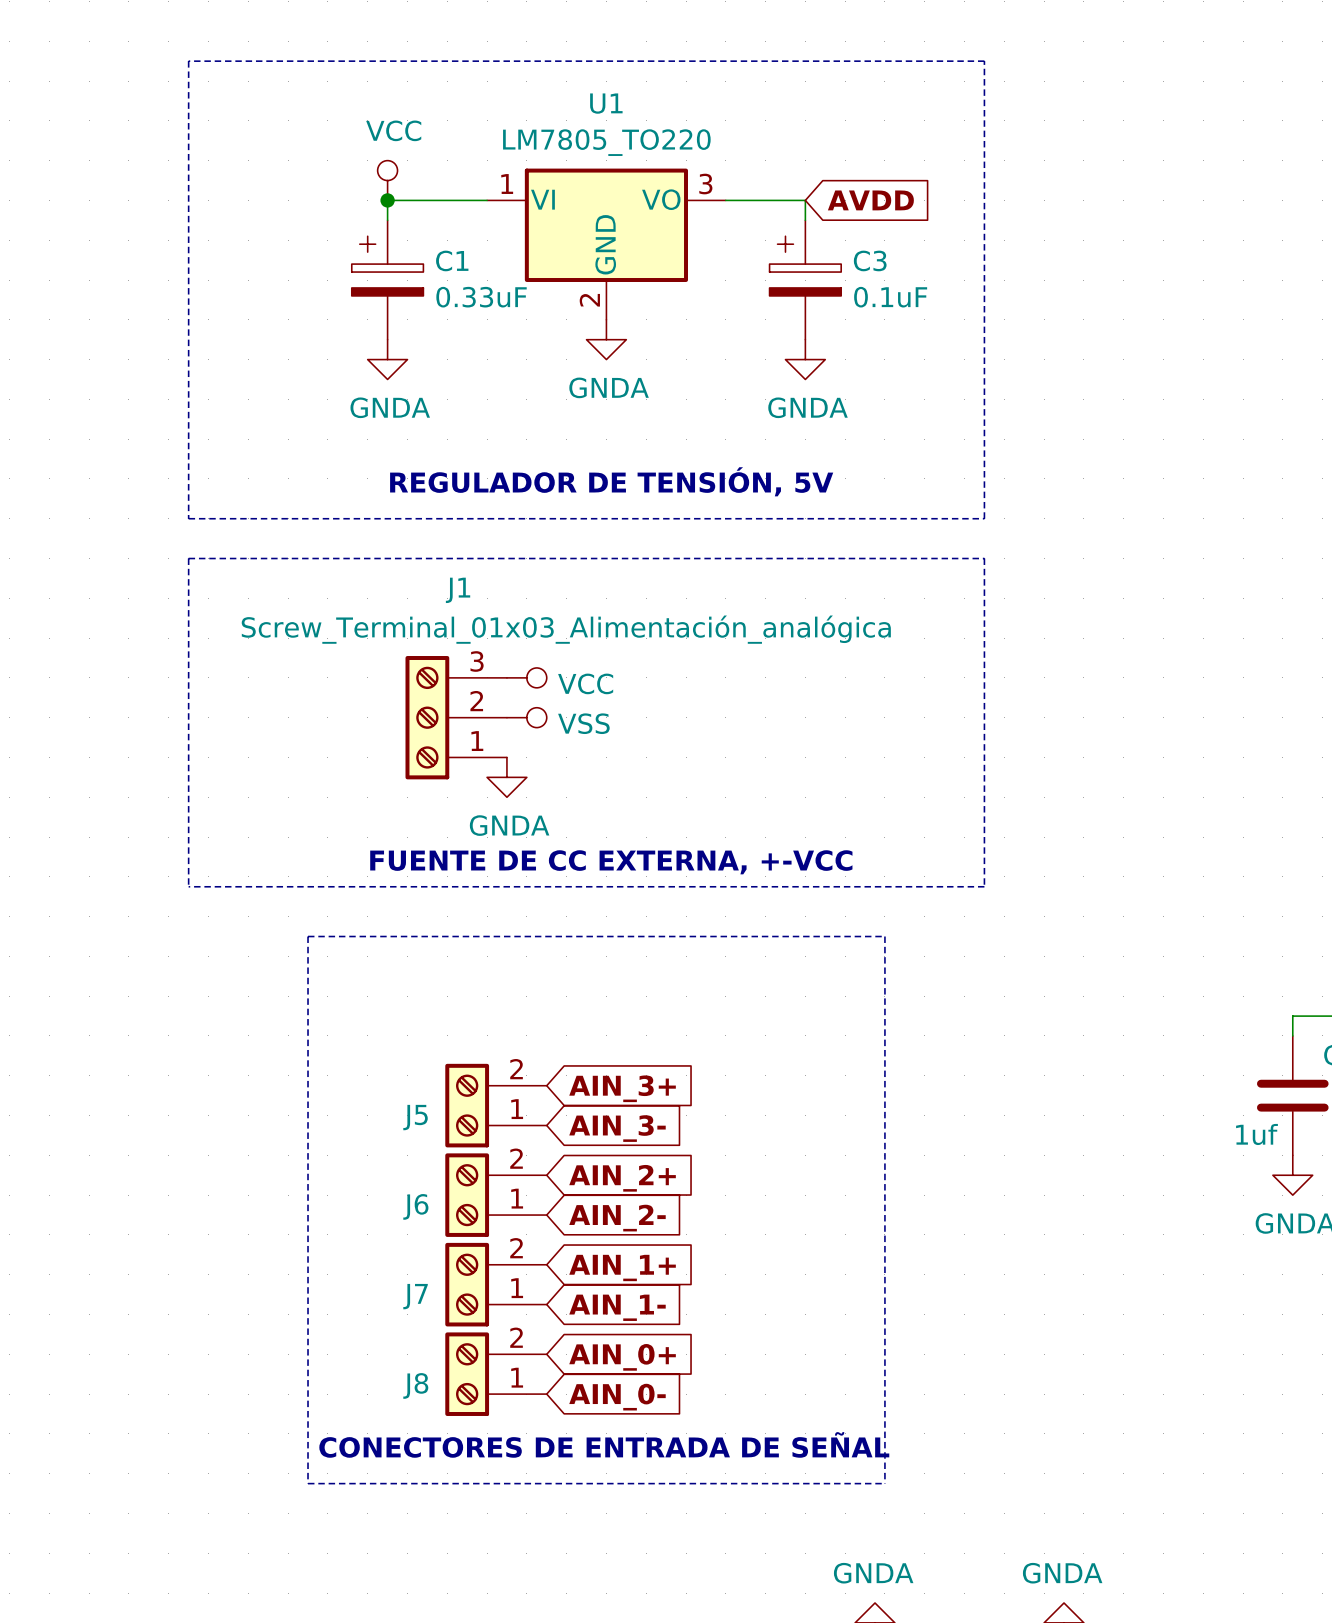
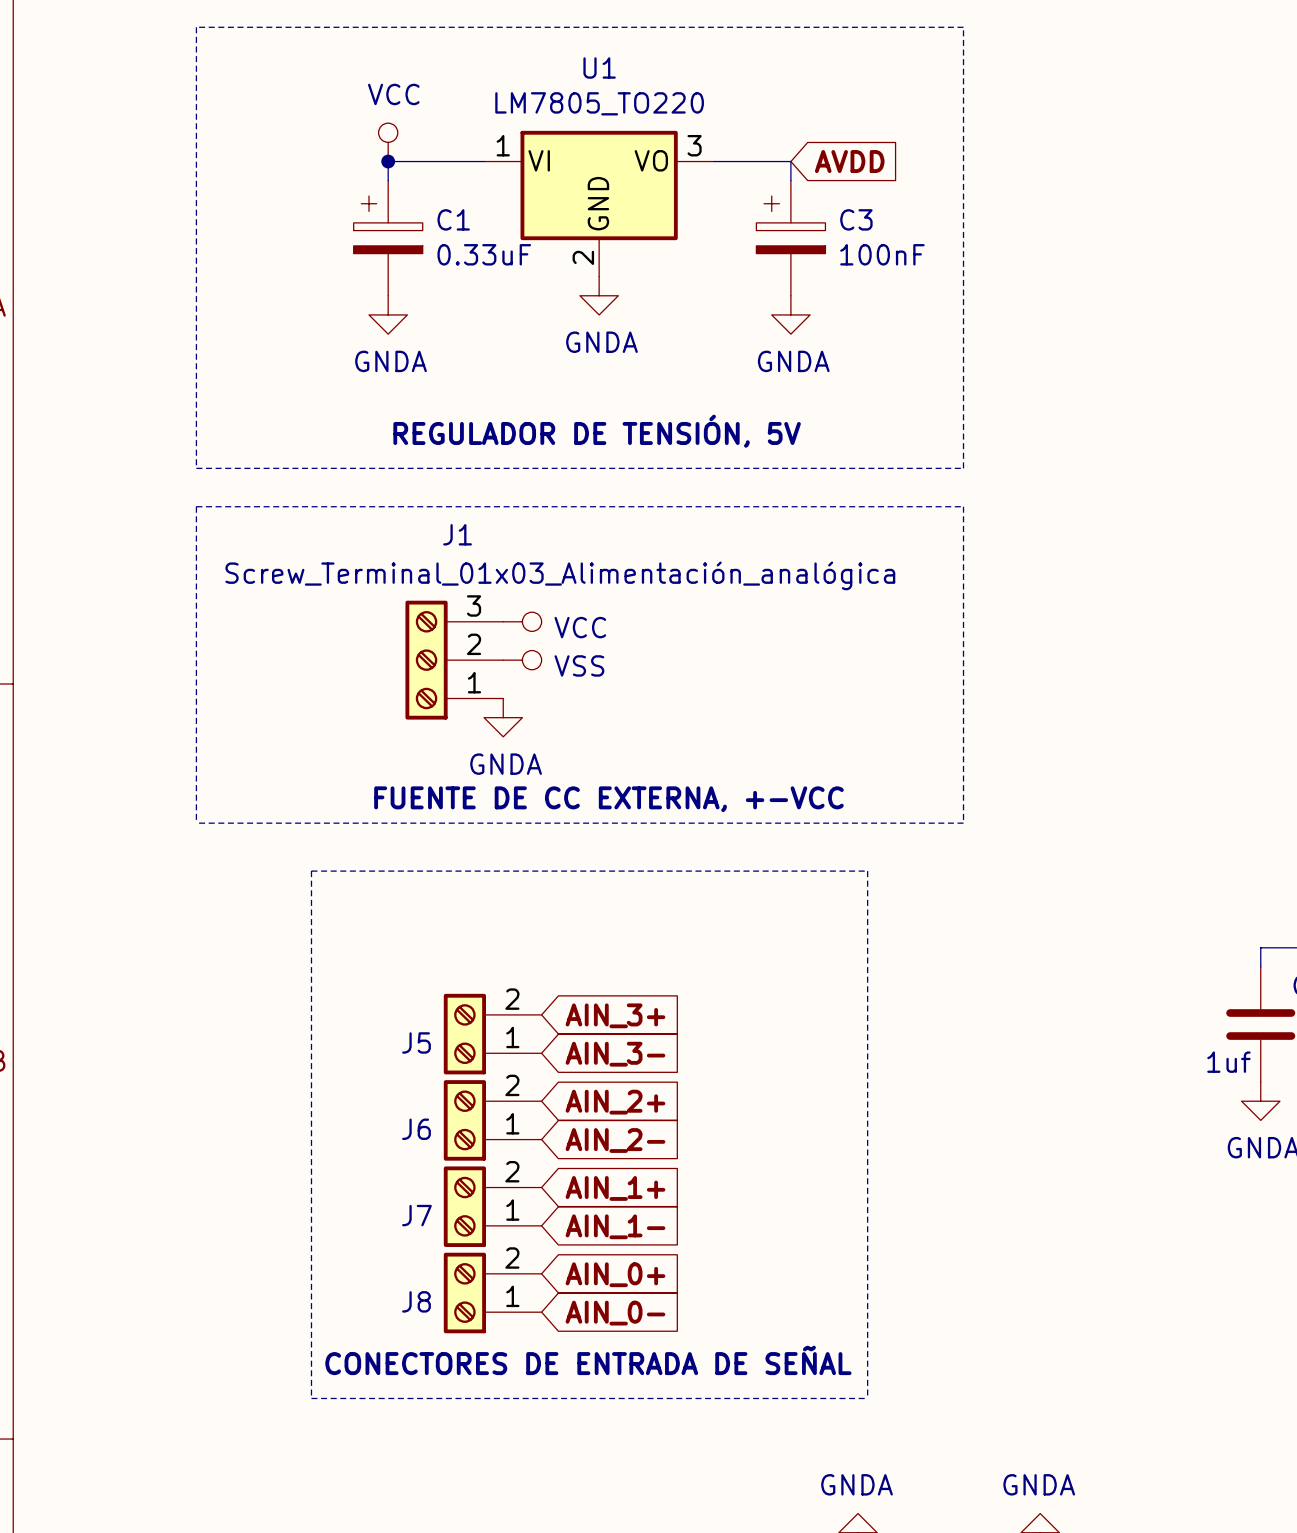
C3 value: 0.1uF (890, 297) -> 100nF (882, 254)

